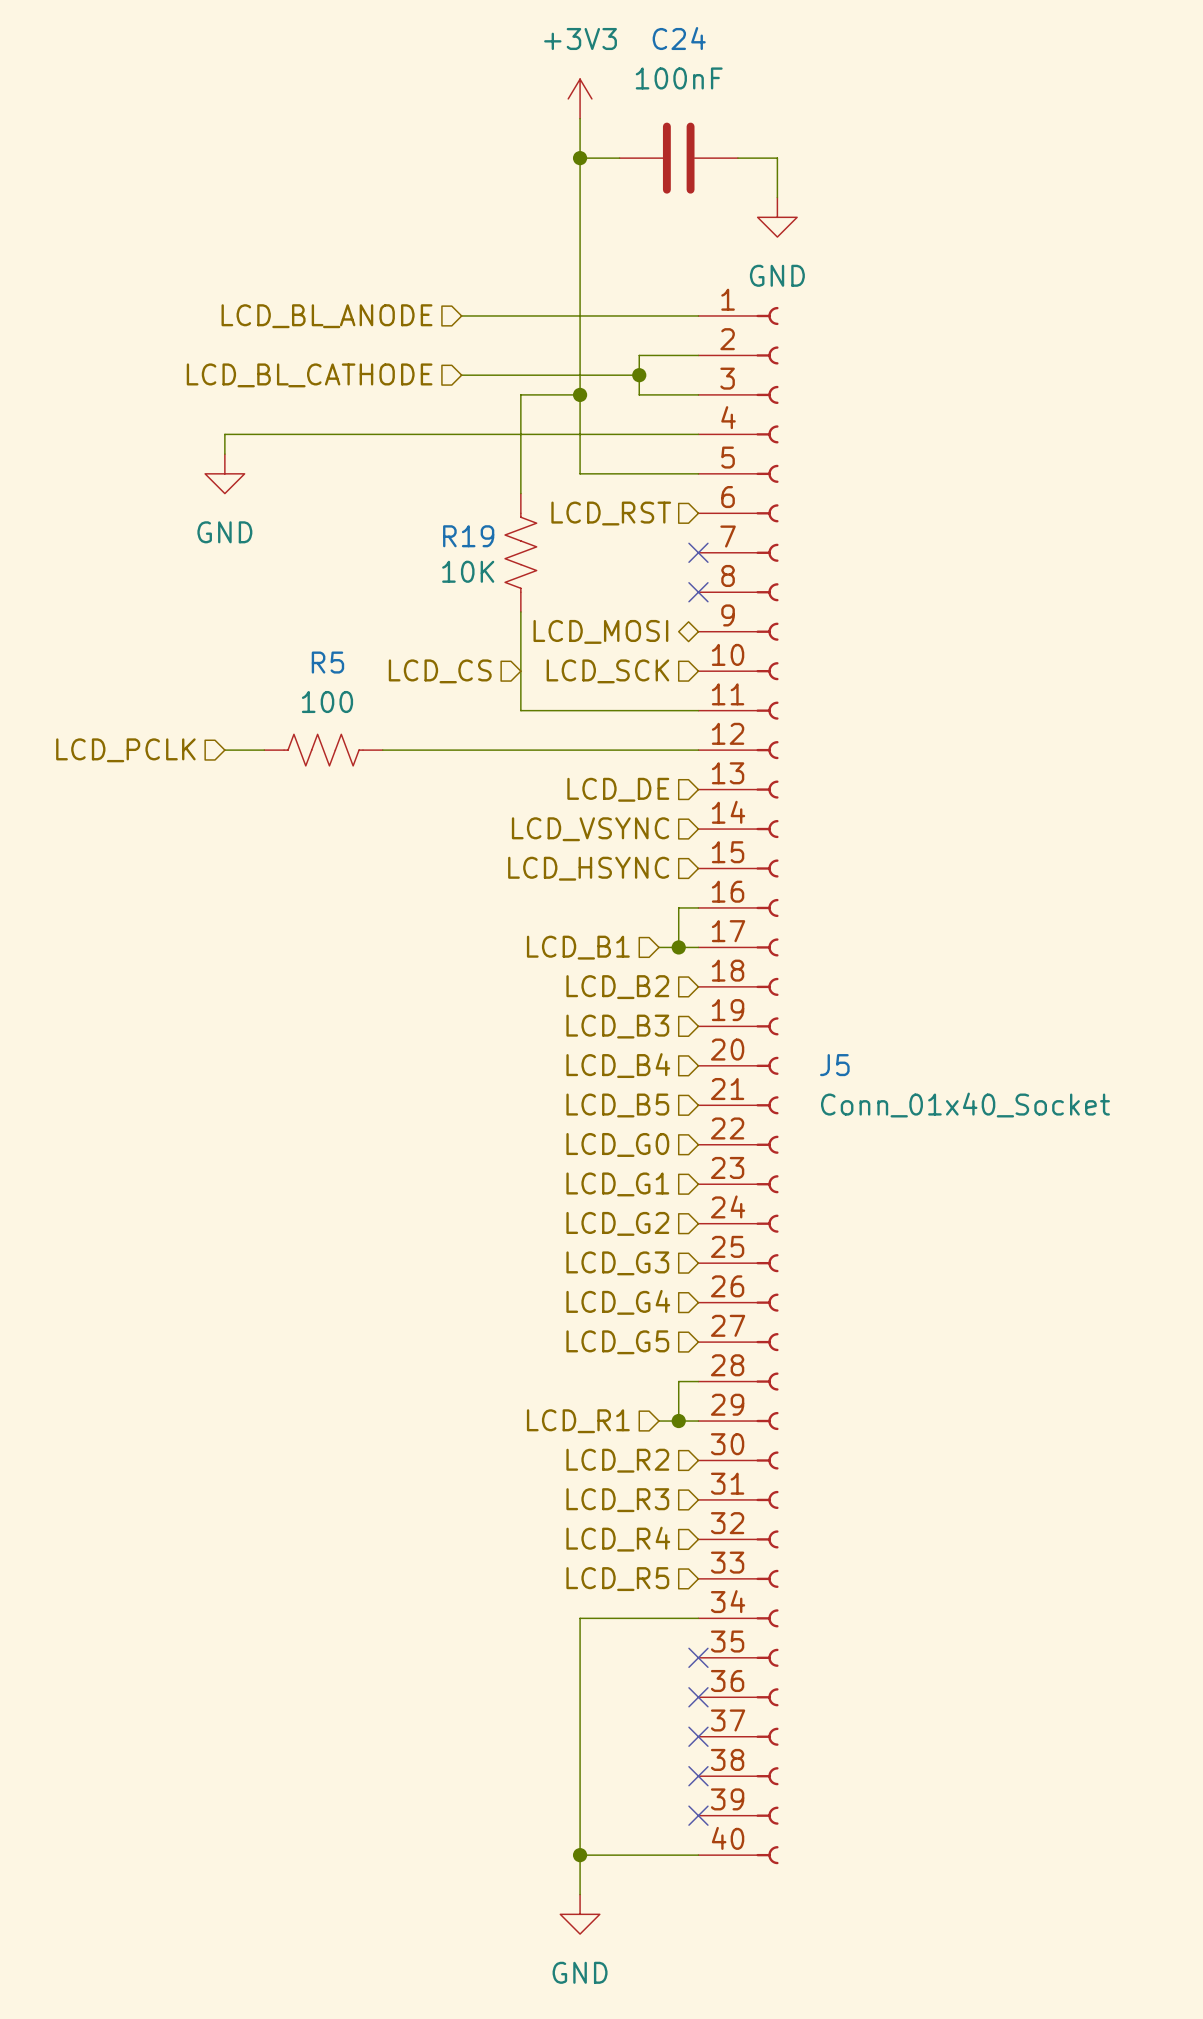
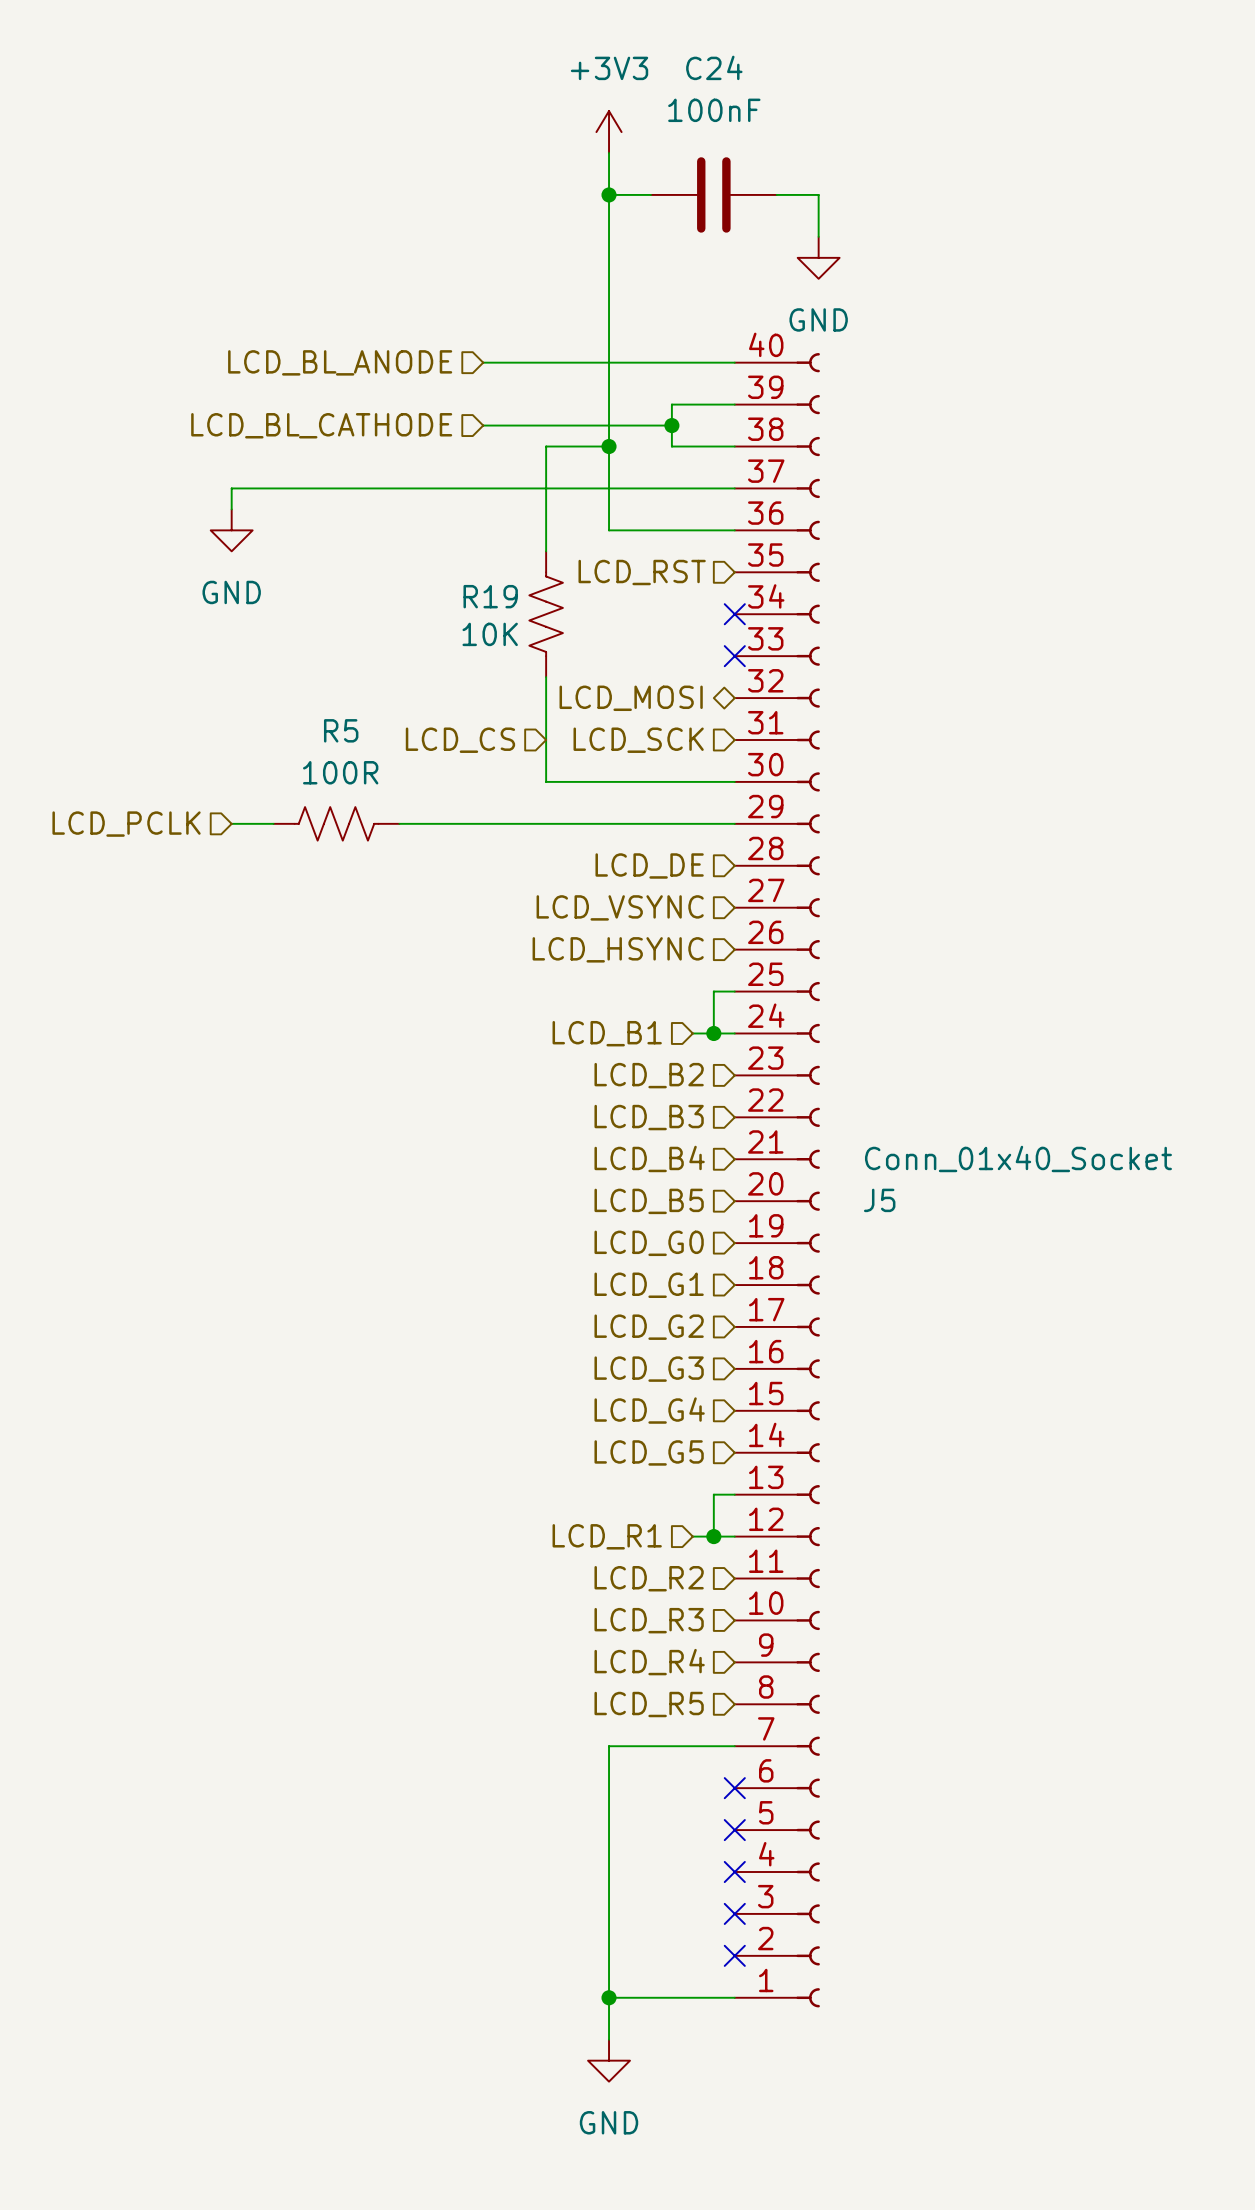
R5 value: 100 (327, 702) -> 100R (340, 772)
J5 flip: as is (767, 1085) -> up-down (808, 1180)

